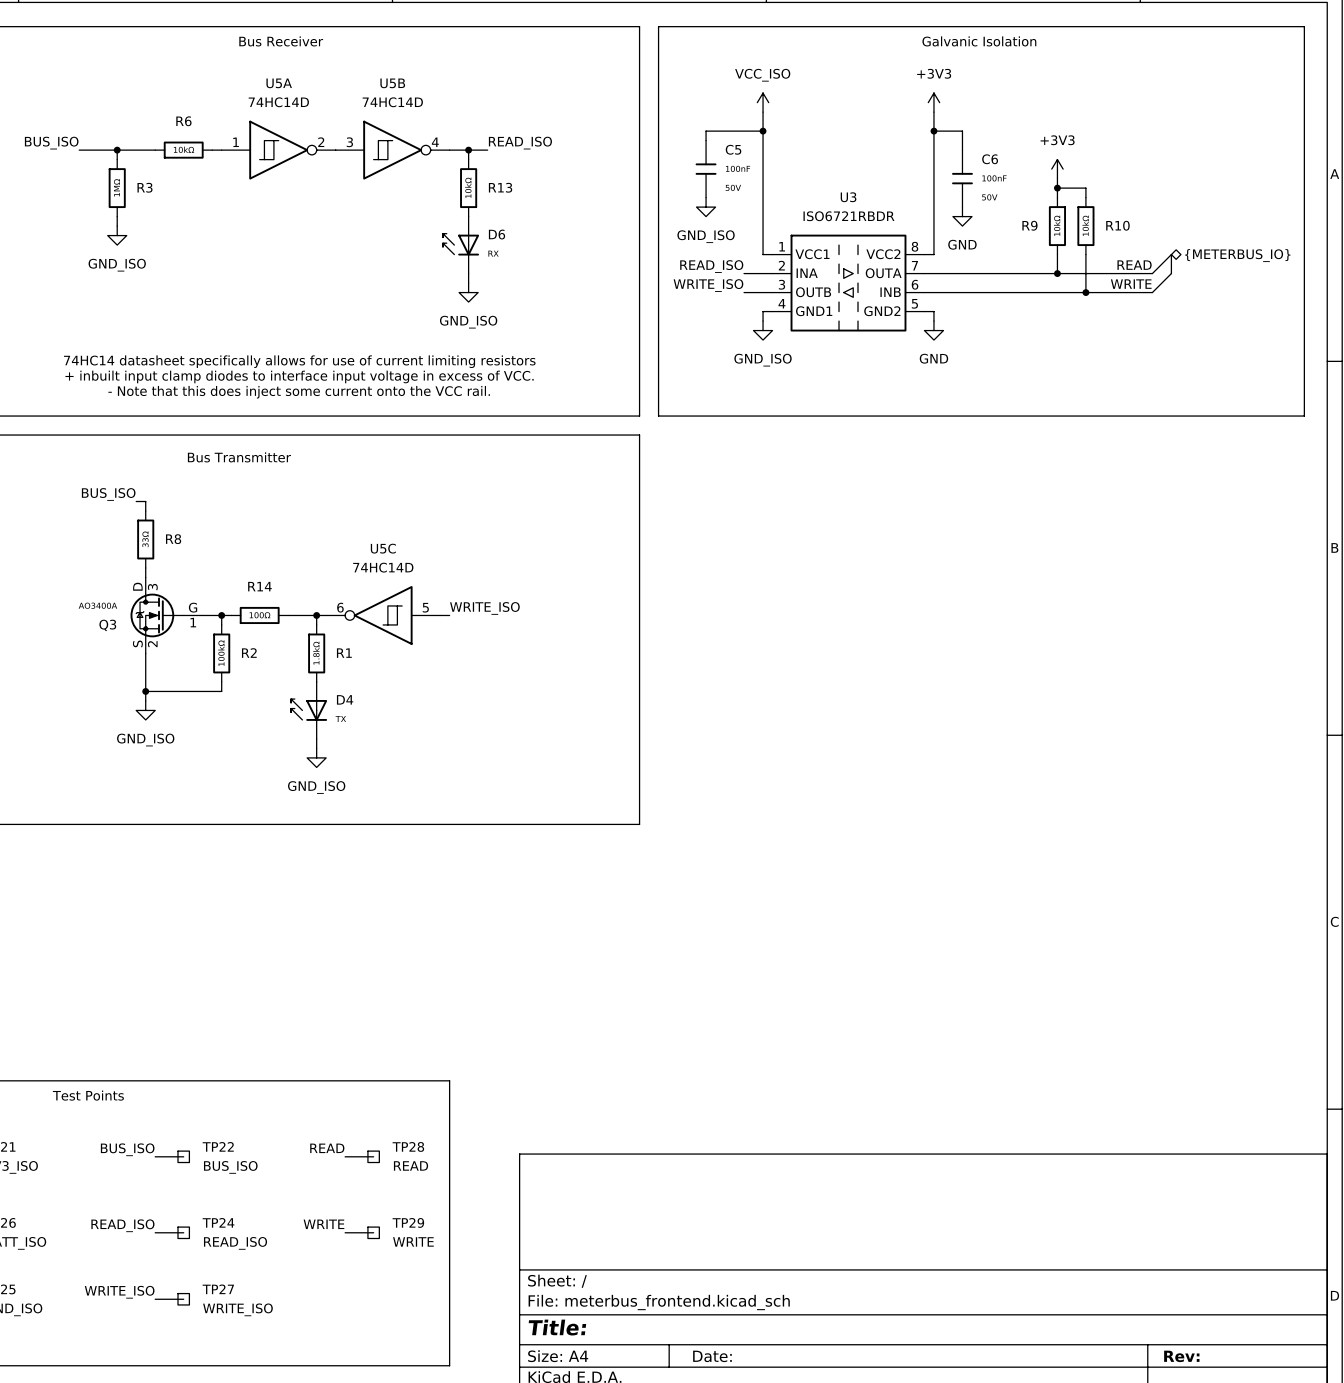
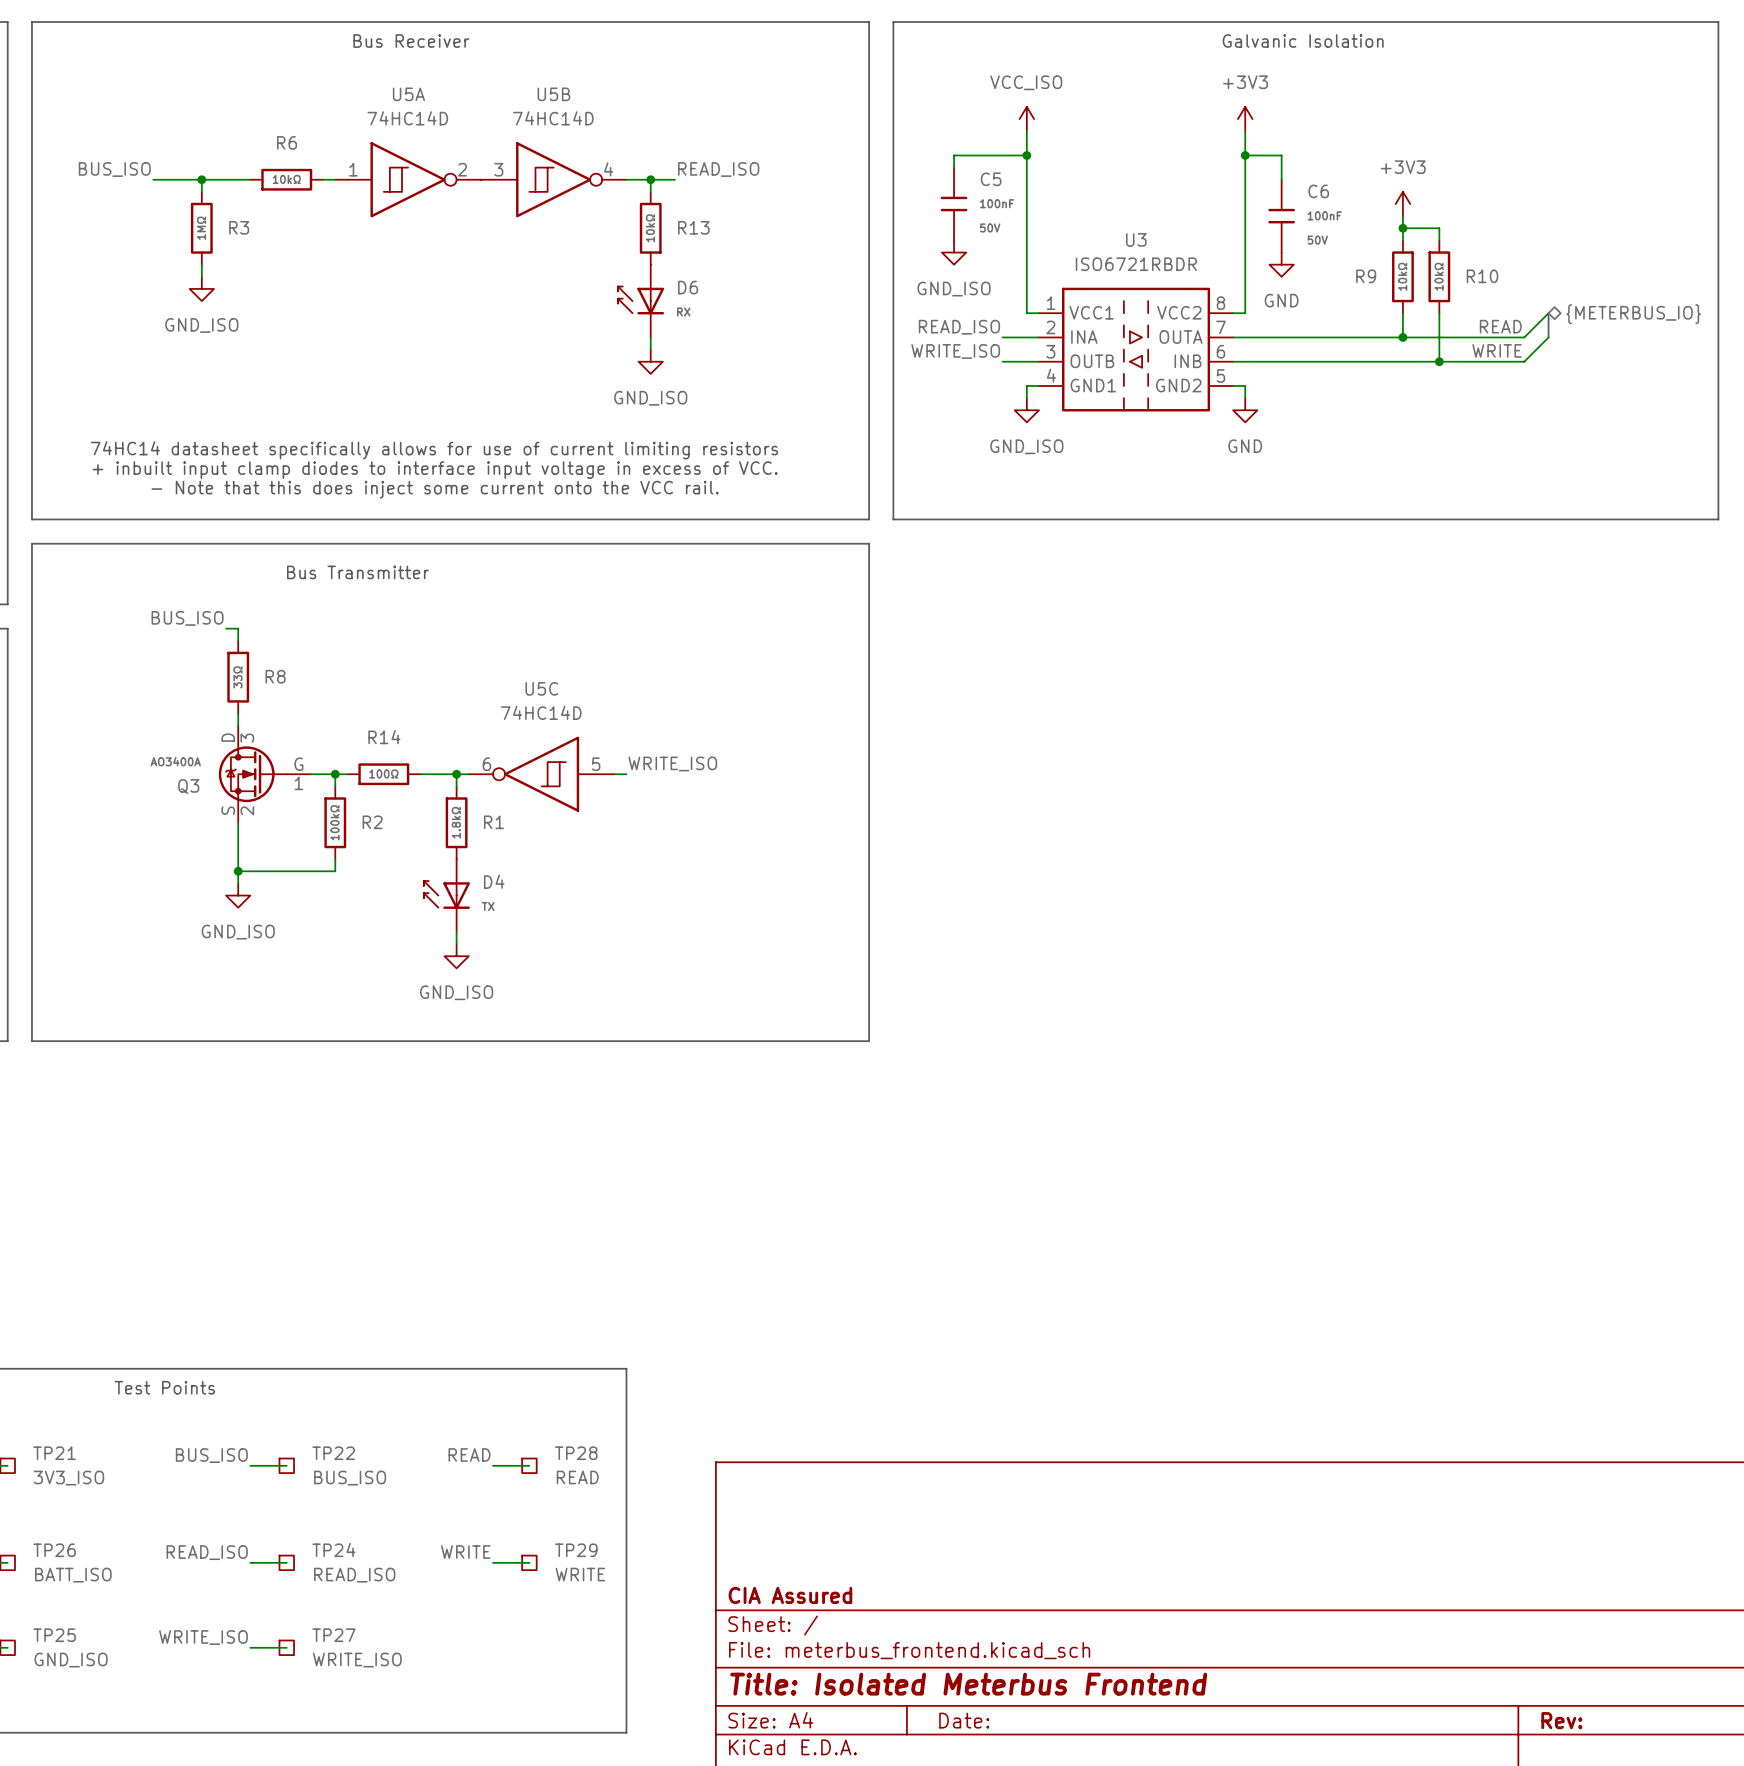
title block: none -> CIA Assured (790, 1595)
title block: Title: (557, 1327) -> Title: Isolated Meterbus Frontend (968, 1684)

